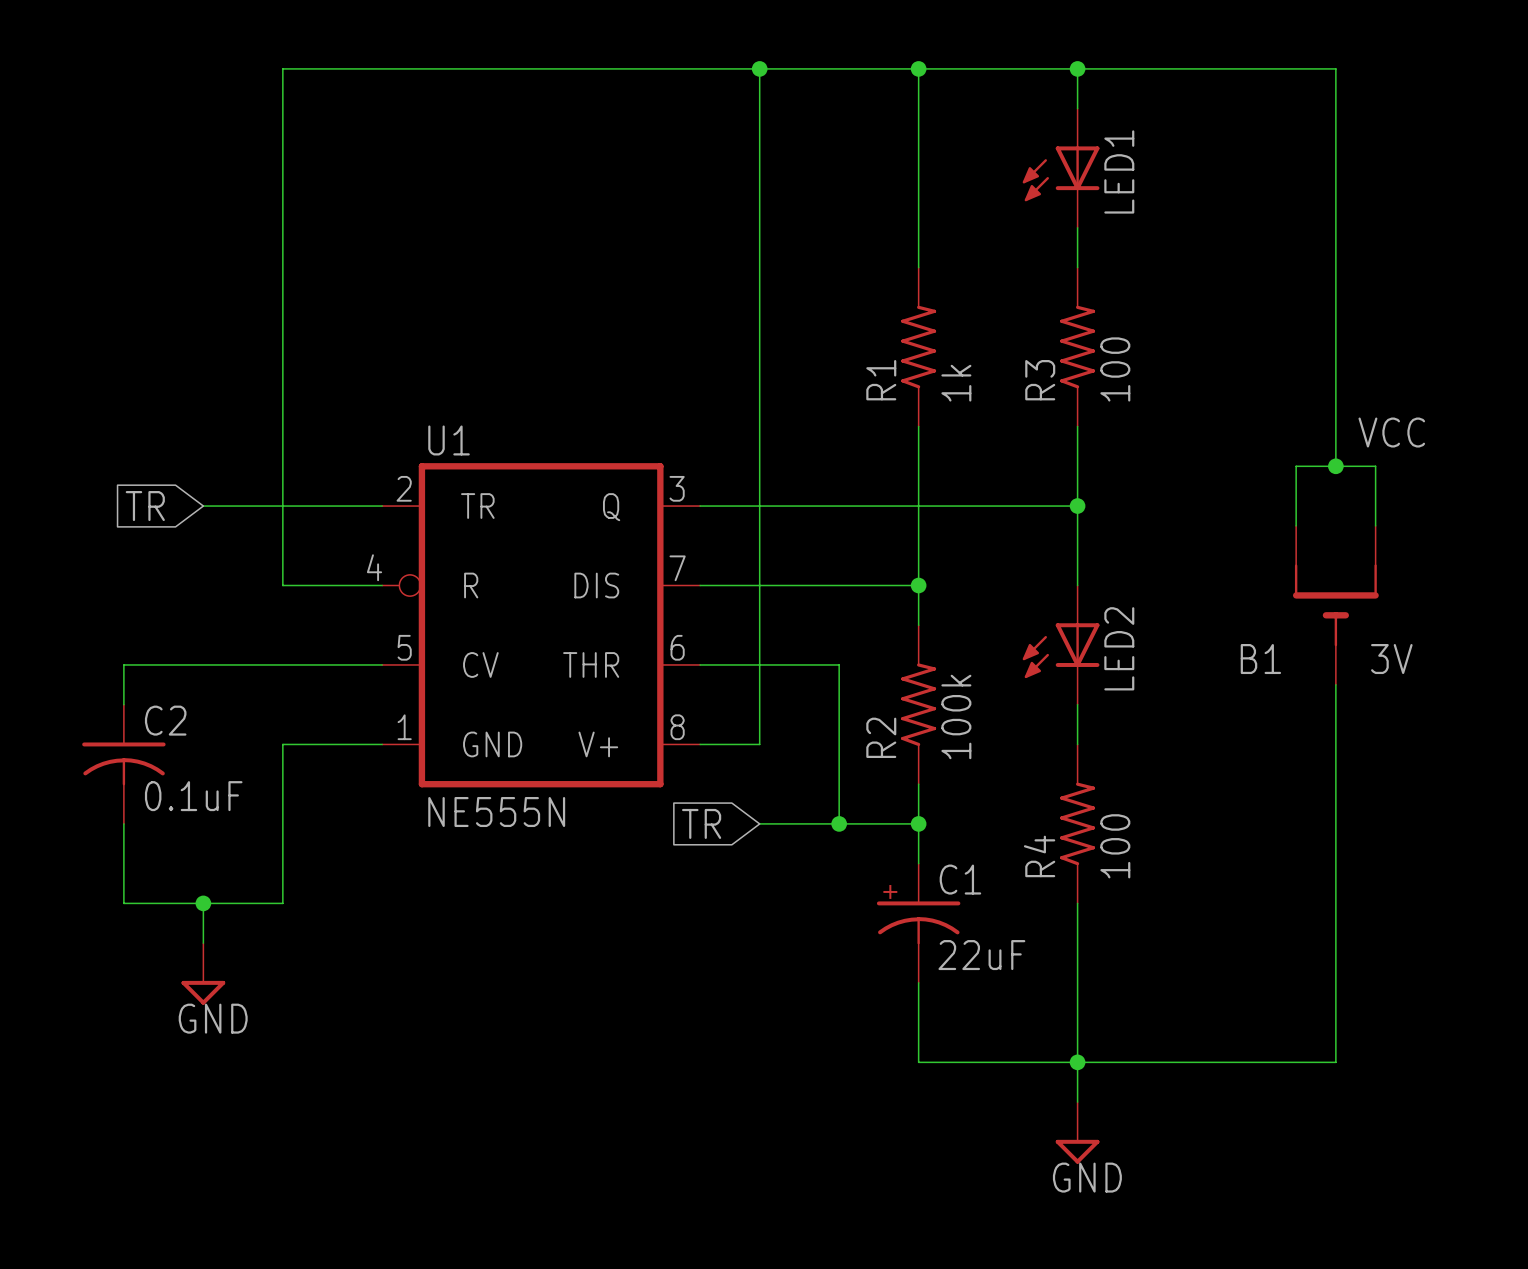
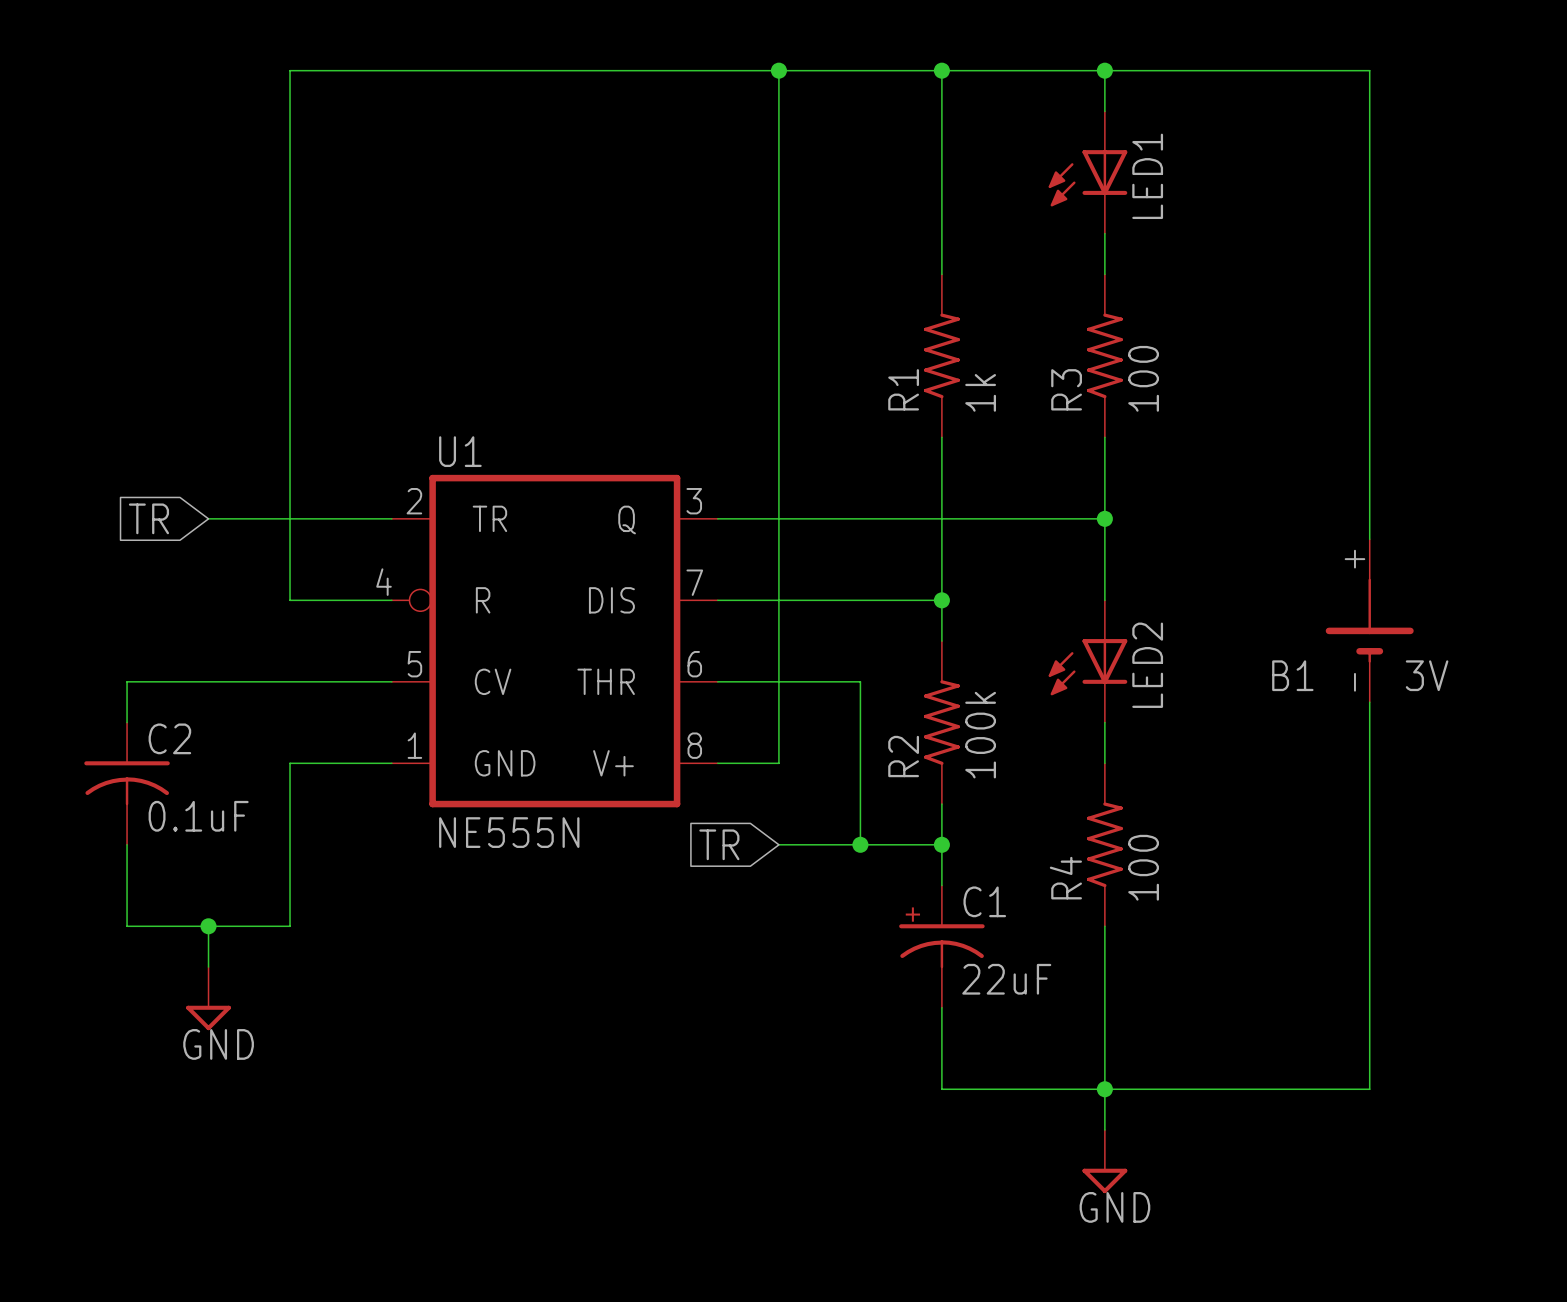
label: VCC (1391, 432) -> none
wire: none -> (1369, 478) (1369, 539)
junction: (1335, 466) -> none
B1 symbol: [1292, 525, 1379, 685] -> [1325, 539, 1414, 703]
wire: (1296, 525) (1296, 466) (1375, 466) (1375, 525) -> none

